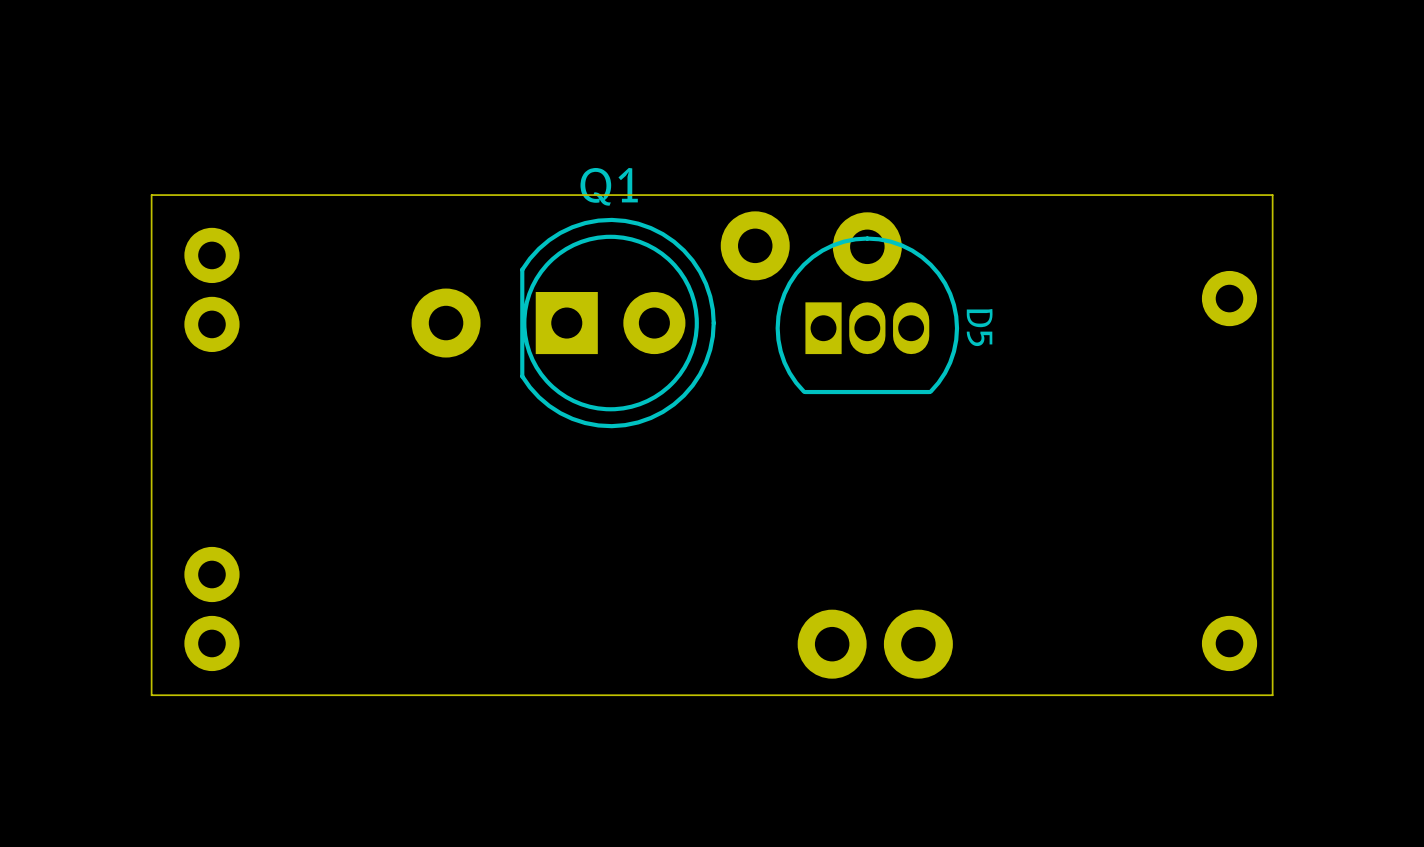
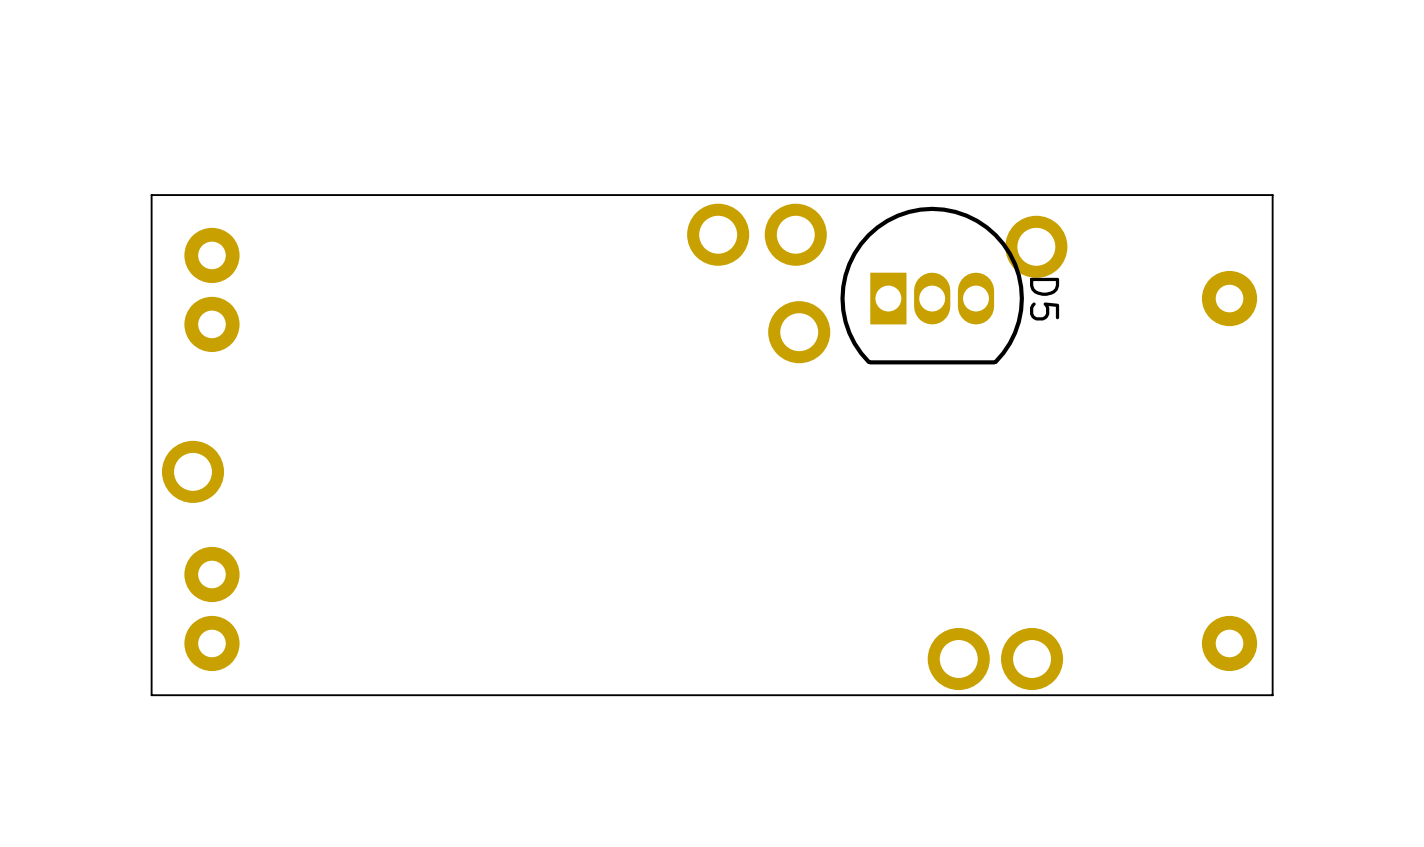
part: none -> (718, 234)
part: none -> (795, 234)
part: (755, 245) -> none
part: (867, 246) -> none
part: none -> (1036, 246)
D5 position: (867, 315) -> (932, 285)
part: (446, 323) -> none
Q1: (618, 323) -> none
part: none -> (799, 332)
part: none -> (193, 471)
part: (832, 644) -> none
part: (918, 644) -> none
part: none -> (958, 659)
part: none -> (1032, 659)

